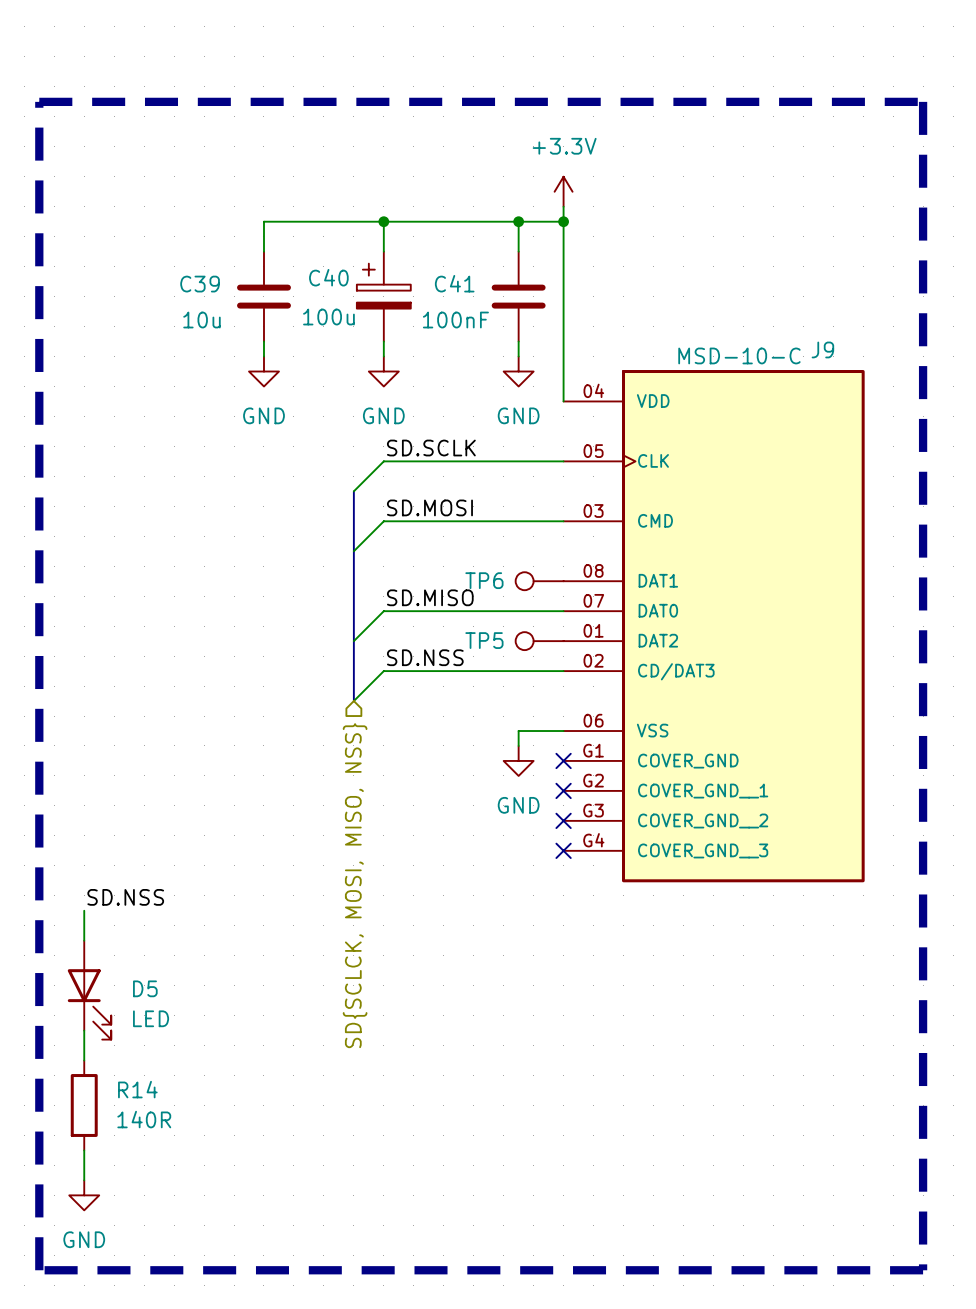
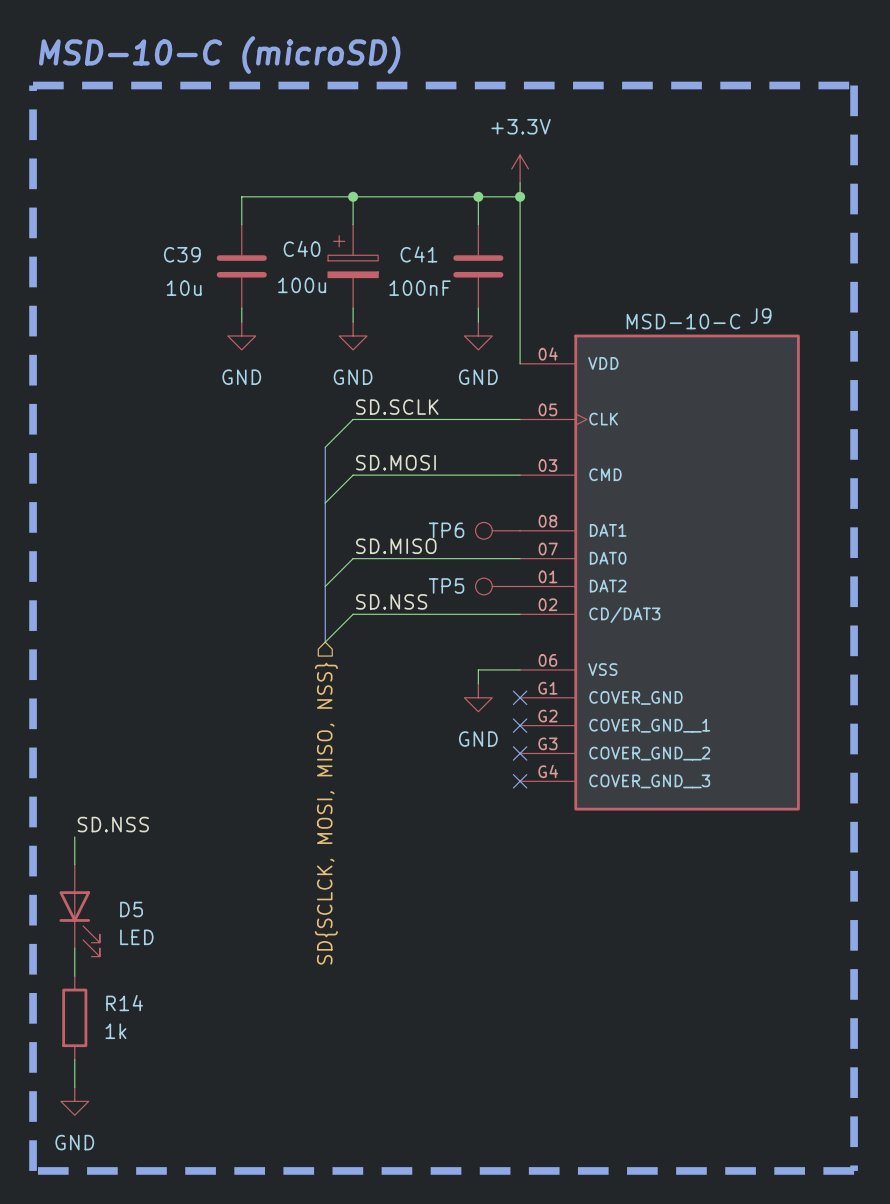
text: none -> MSD-10-C (microSD) (219, 55)
R14 value: 140R (144, 1119) -> 1k (115, 1031)

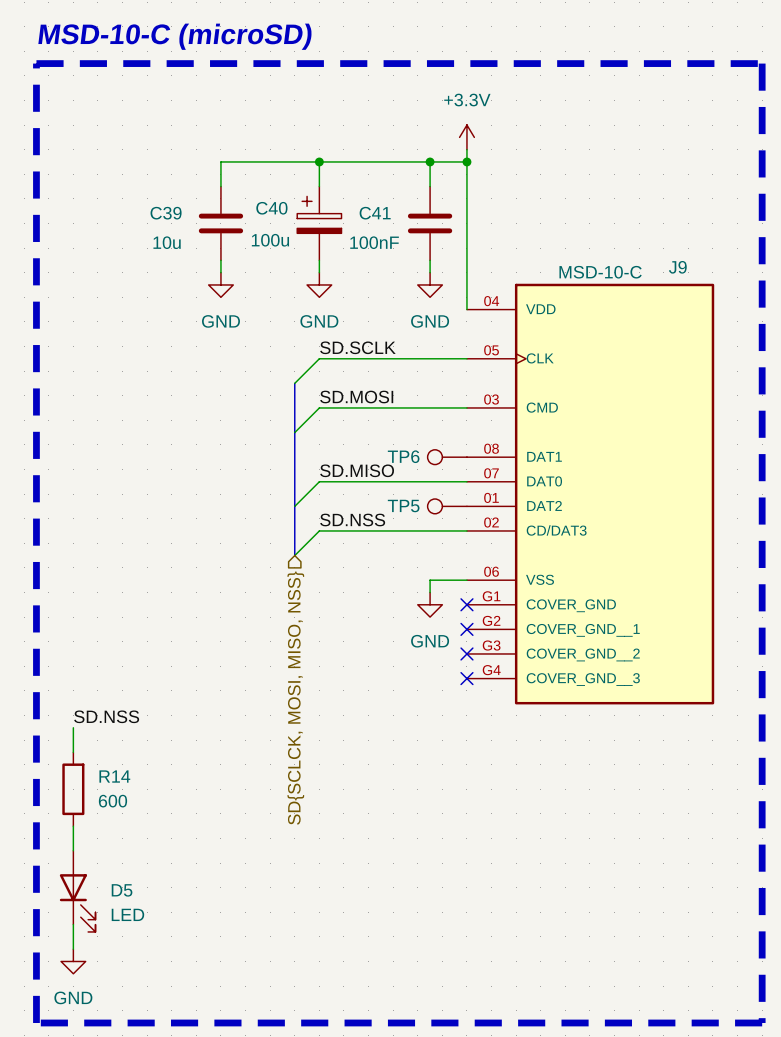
D5 position: (79, 910) -> (77, 891)
R14 position: (74, 1017) -> (73, 789)
R14 value: 1k (115, 1031) -> 600 (112, 801)

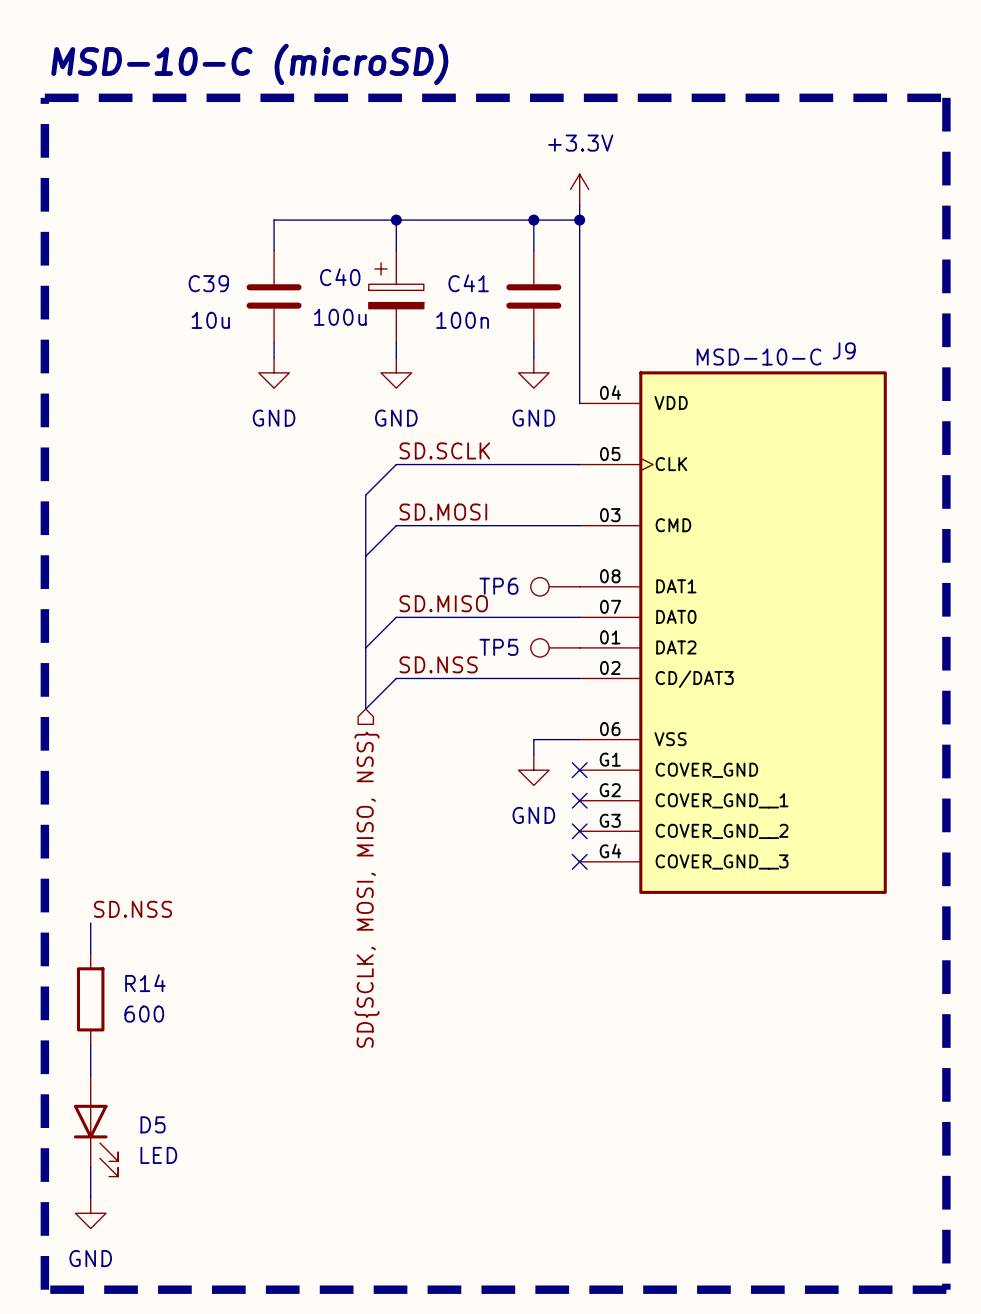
C41 value: 100nF (374, 242) -> 100n (462, 320)
hierarchical label: SD{SCLCK, MOSI, MISO, NSS} (295, 698) -> SD{SCLK, MOSI, MISO, NSS} (366, 889)

